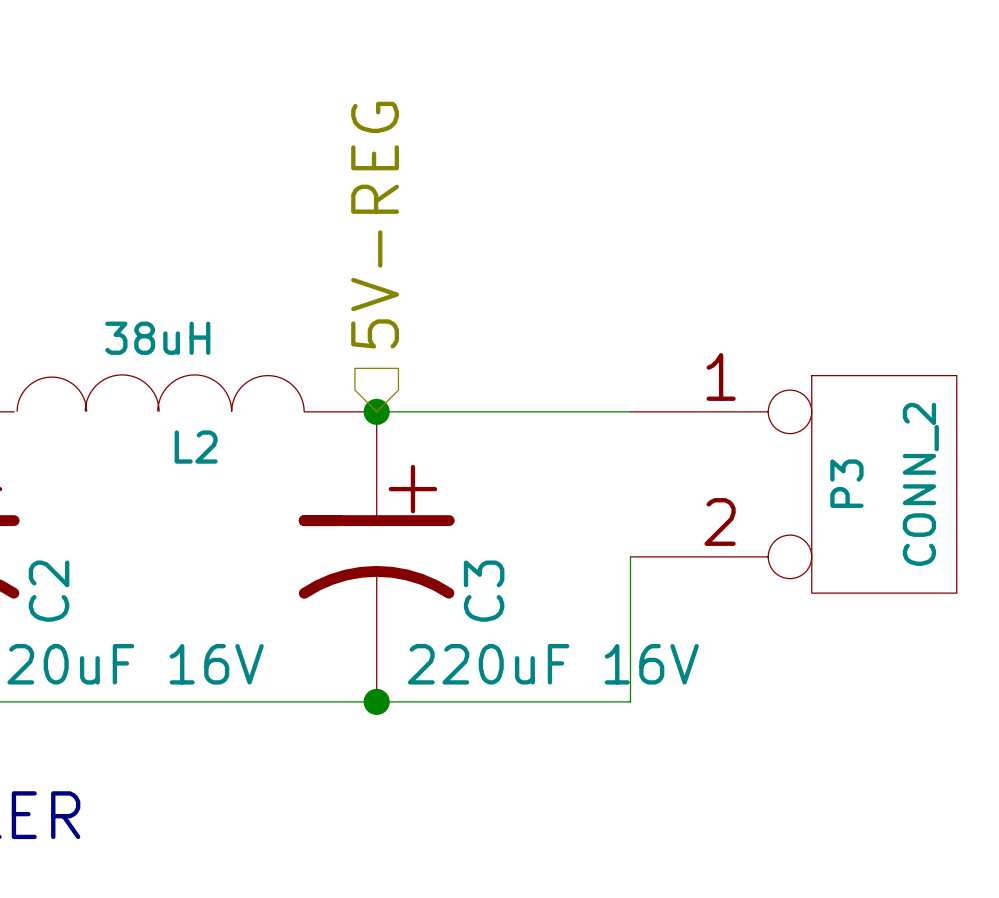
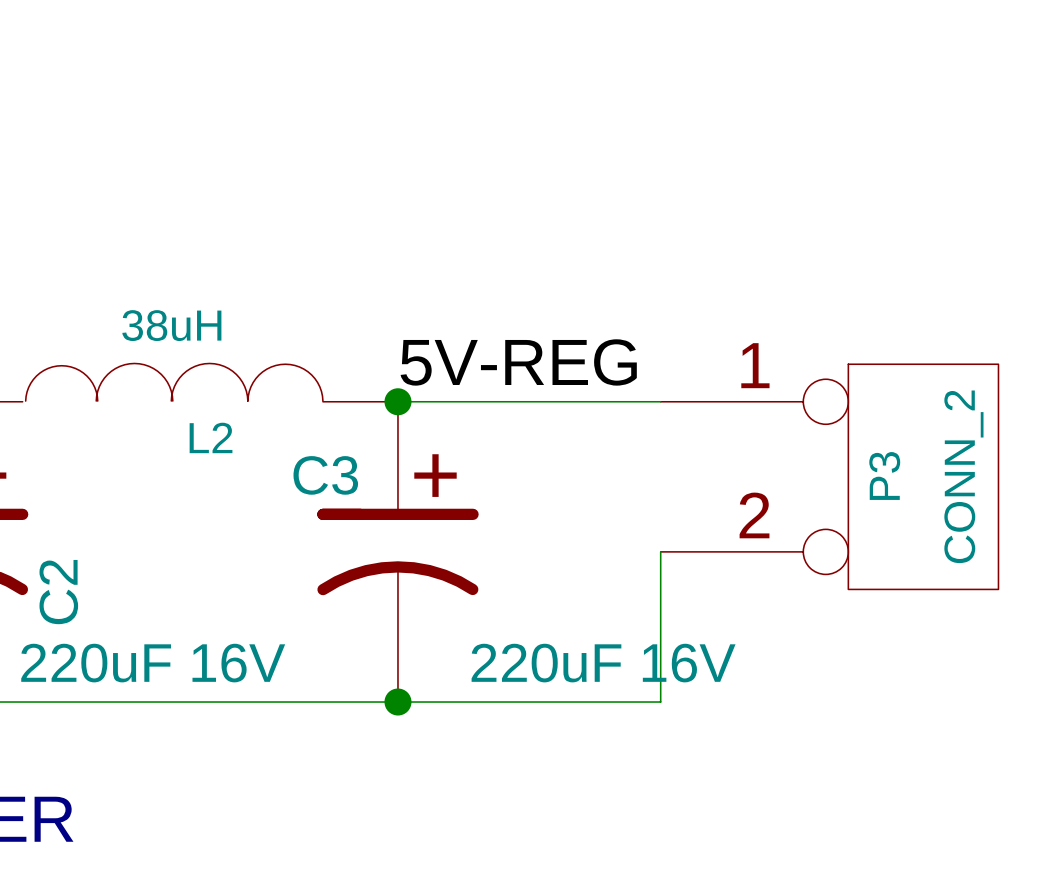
hierarchical label: 5V-REG (375, 225) -> none
label: none -> 5V-REG (518, 362)
C3 name rotation: 0° (484, 591) -> 90° clockwise (325, 475)
C3 name position: C3 (484, 591) -> C3 (325, 475)

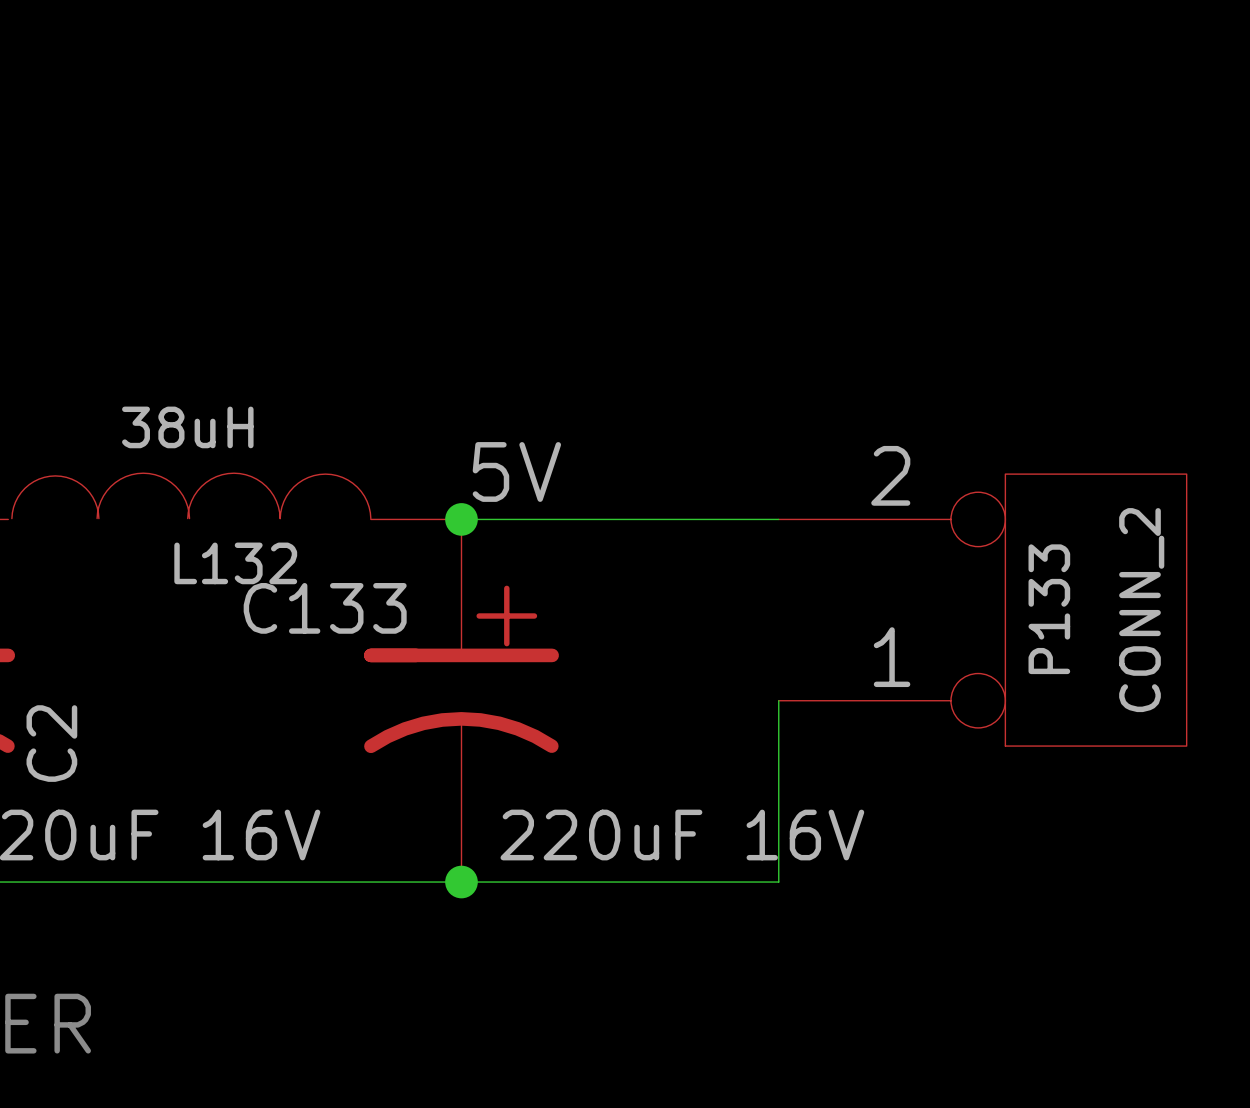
label: 5V-REG (518, 362) -> 5V (516, 471)
L2 name: L2 (211, 437) -> L132 (235, 563)
C3 name: C3 (325, 475) -> C133 (325, 608)
P3 name: P3 (884, 476) -> P133 (1049, 609)
P3 flip: as is (923, 476) -> up-down (1096, 610)

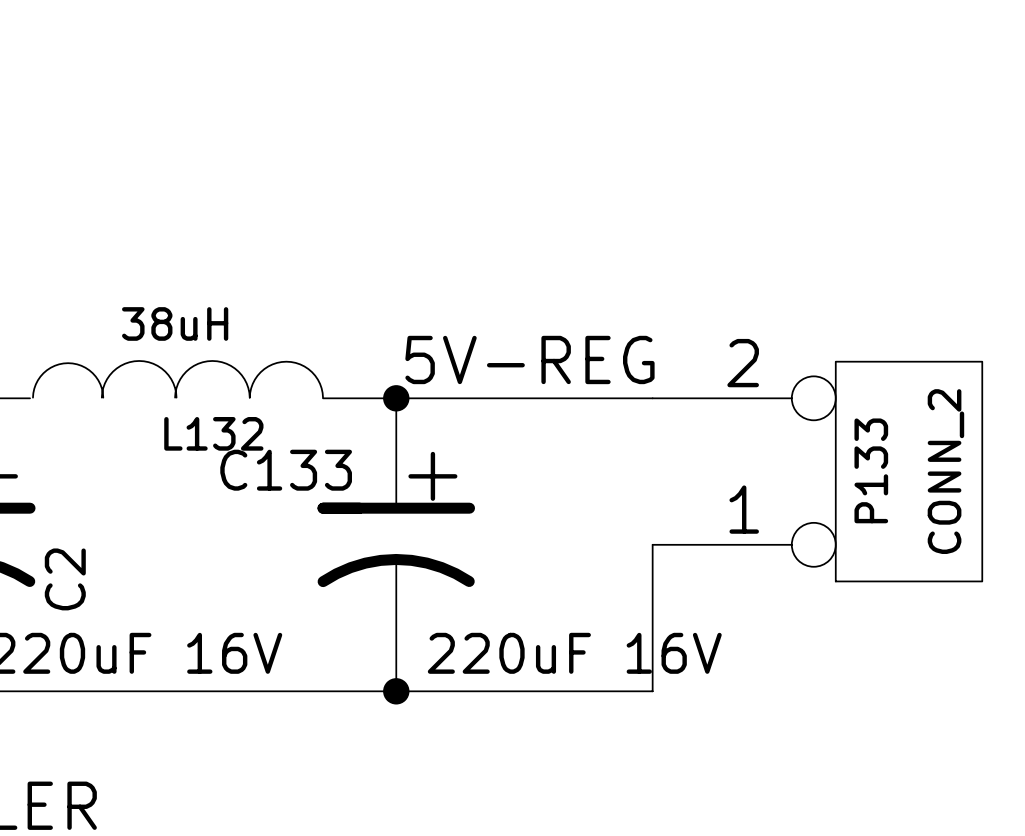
label: 5V (516, 471) -> 5V-REG (529, 359)

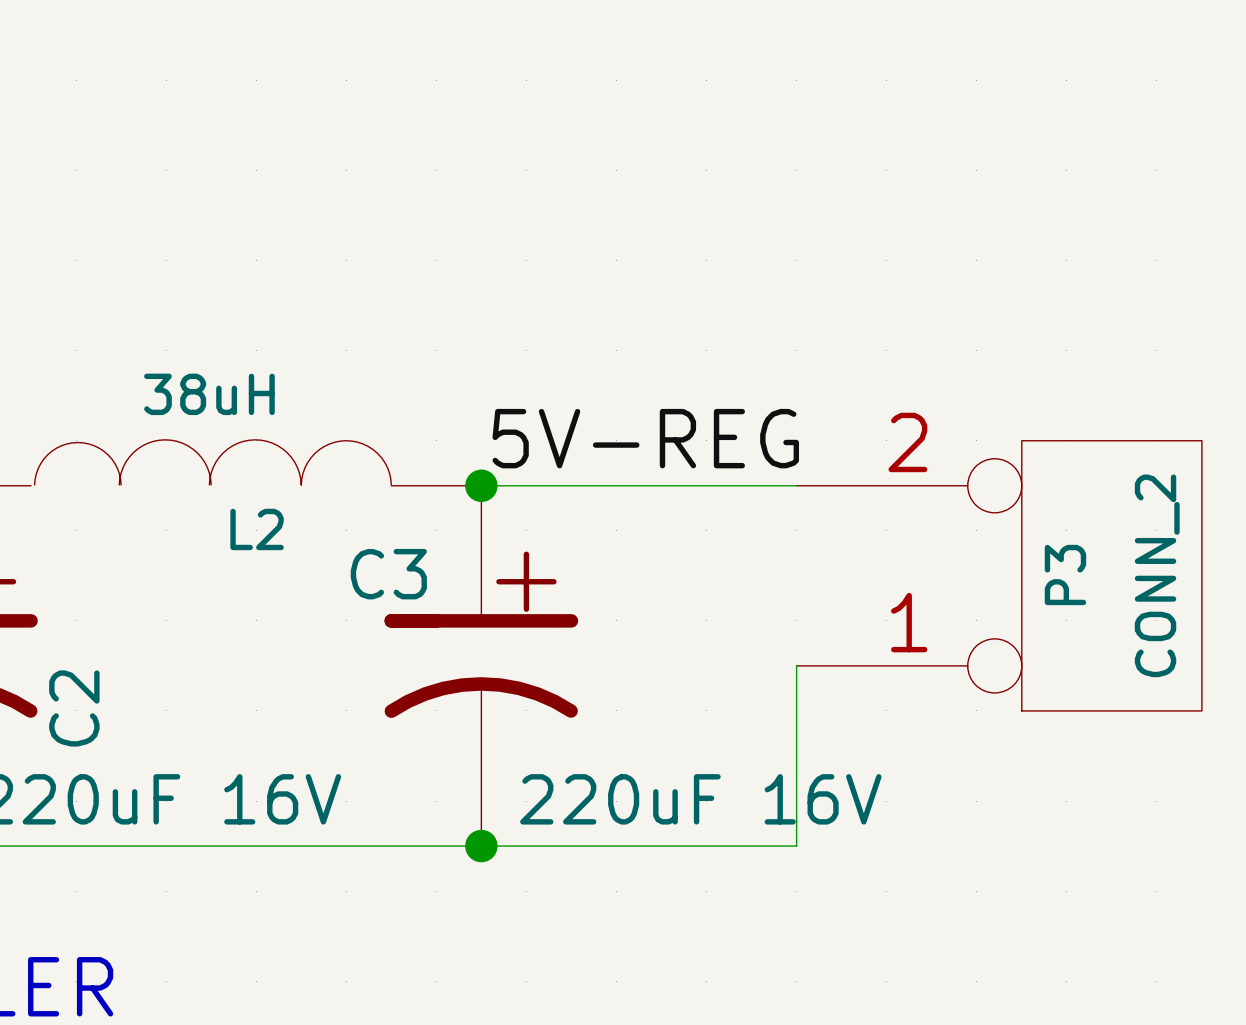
L132 name: L132 (213, 433) -> L2 (257, 529)
C133 name: C133 (286, 470) -> C3 (388, 574)
P133 name: P133 (871, 470) -> P3 (1065, 574)

